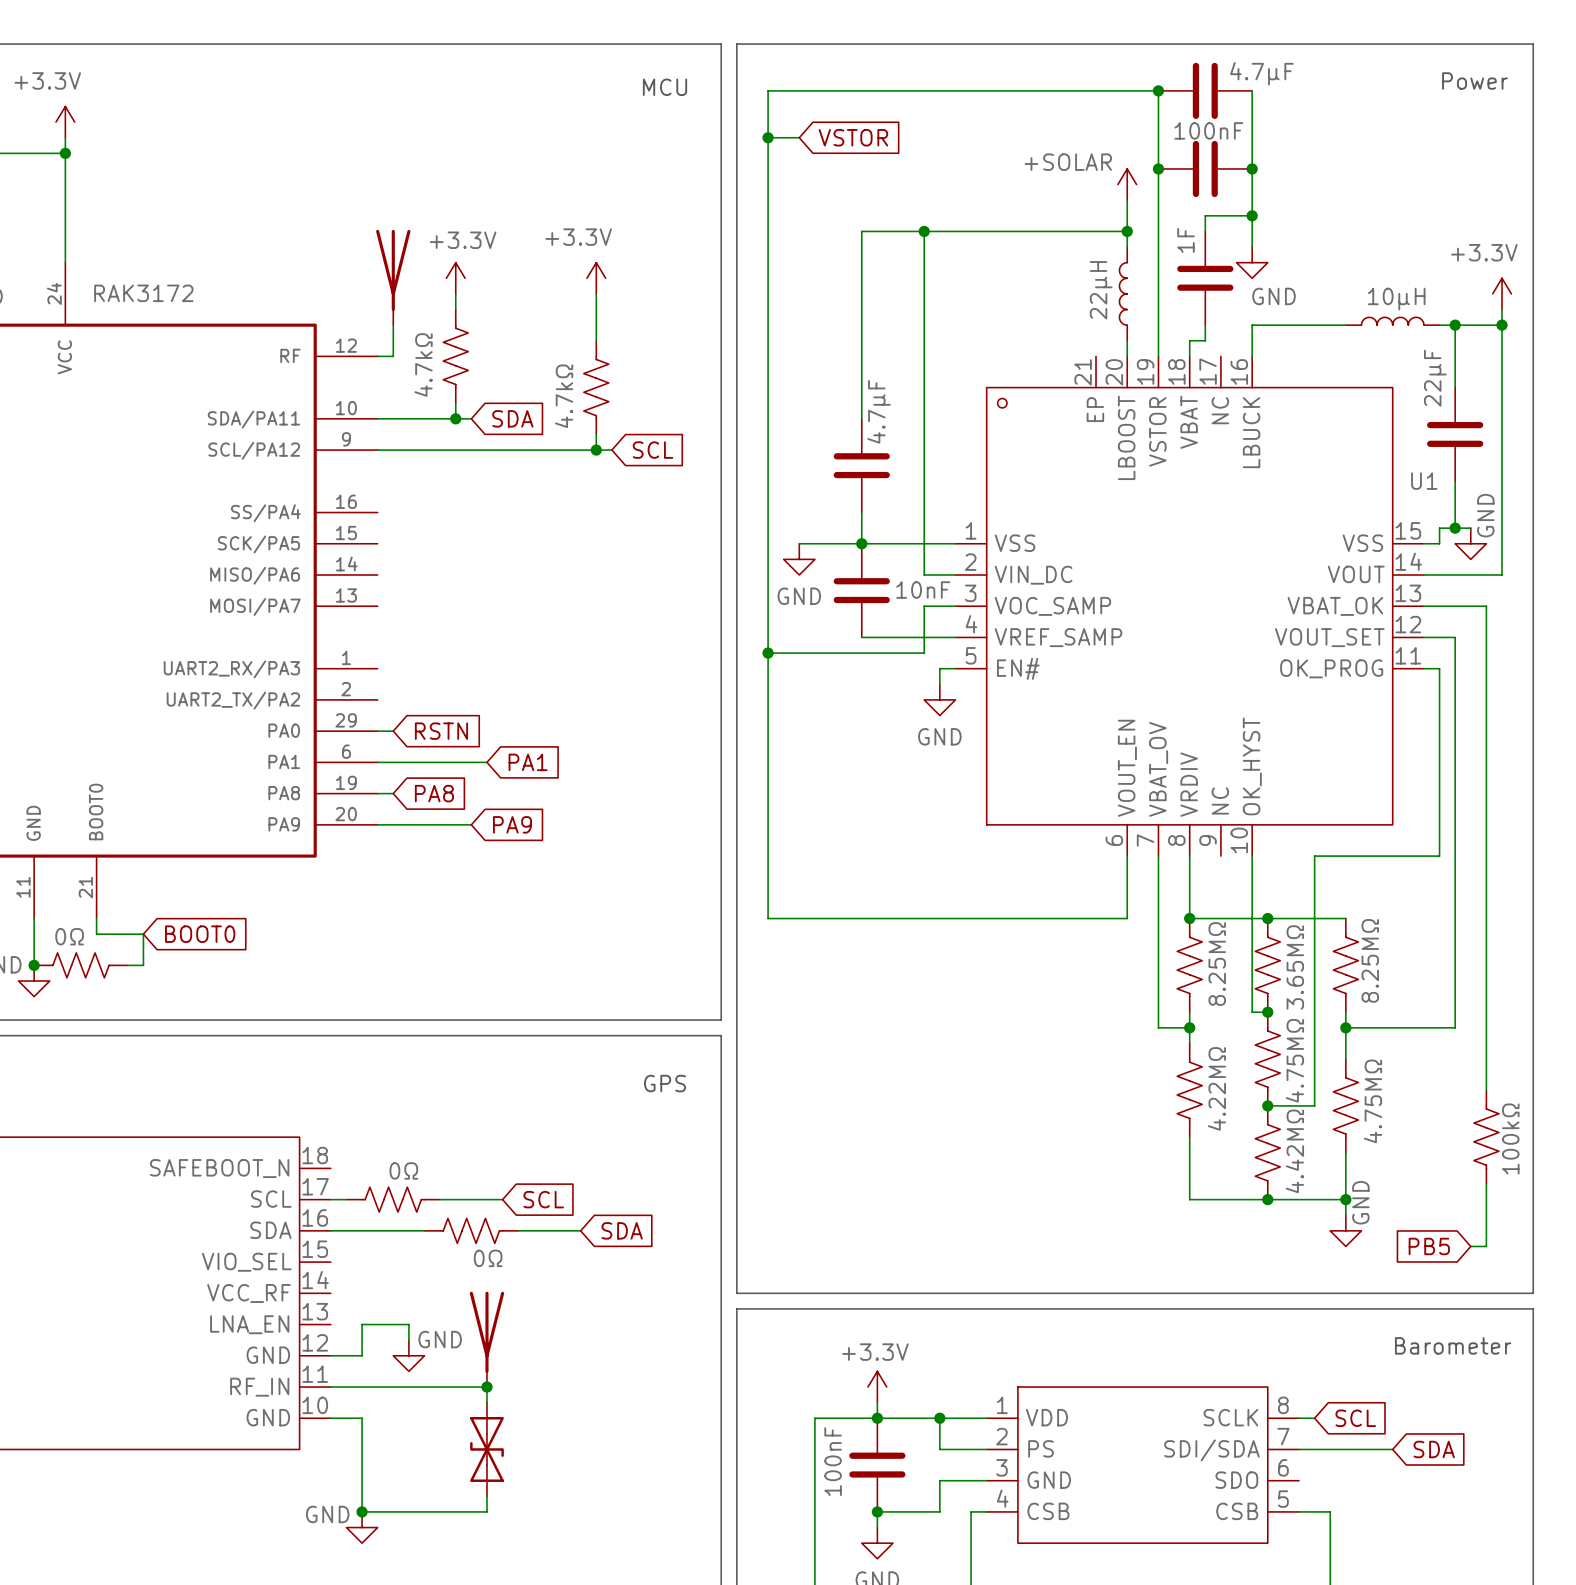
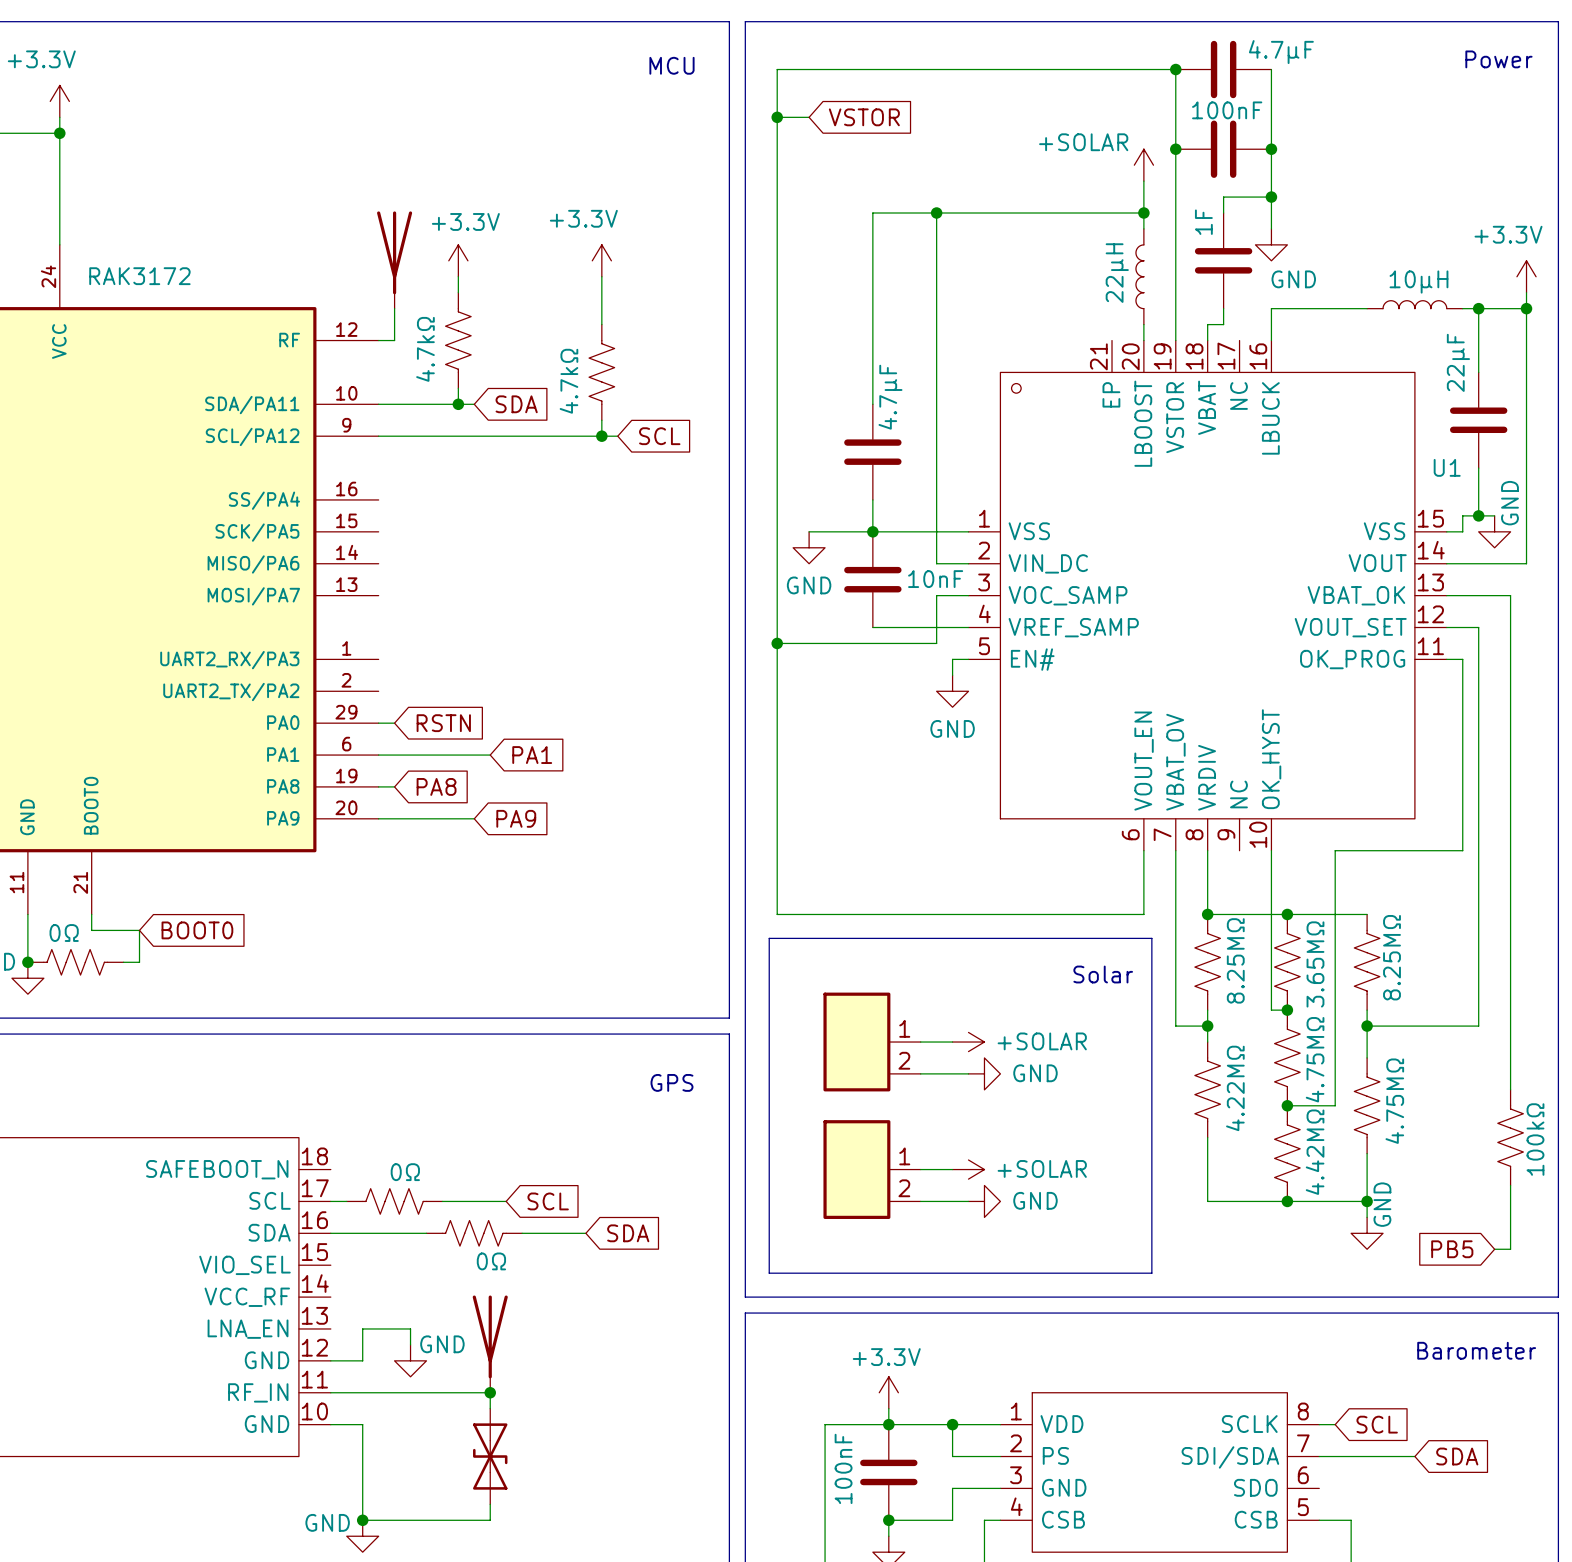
line: none -> (769, 938) (1151, 938) (1151, 1273) (769, 1273) (769, 938)
text: none -> Solar (1103, 974)
part: none -> (872, 1042)
wire: none -> (920, 1042) (952, 1042)
power symbol: none -> +SOLAR (968, 1042)
wire: none -> (920, 1073) (968, 1073)
power symbol: none -> GND (984, 1073)
part: none -> (872, 1169)
wire: none -> (920, 1169) (952, 1169)
power symbol: none -> +SOLAR (968, 1169)
wire: none -> (920, 1201) (968, 1201)
power symbol: none -> GND (984, 1201)

